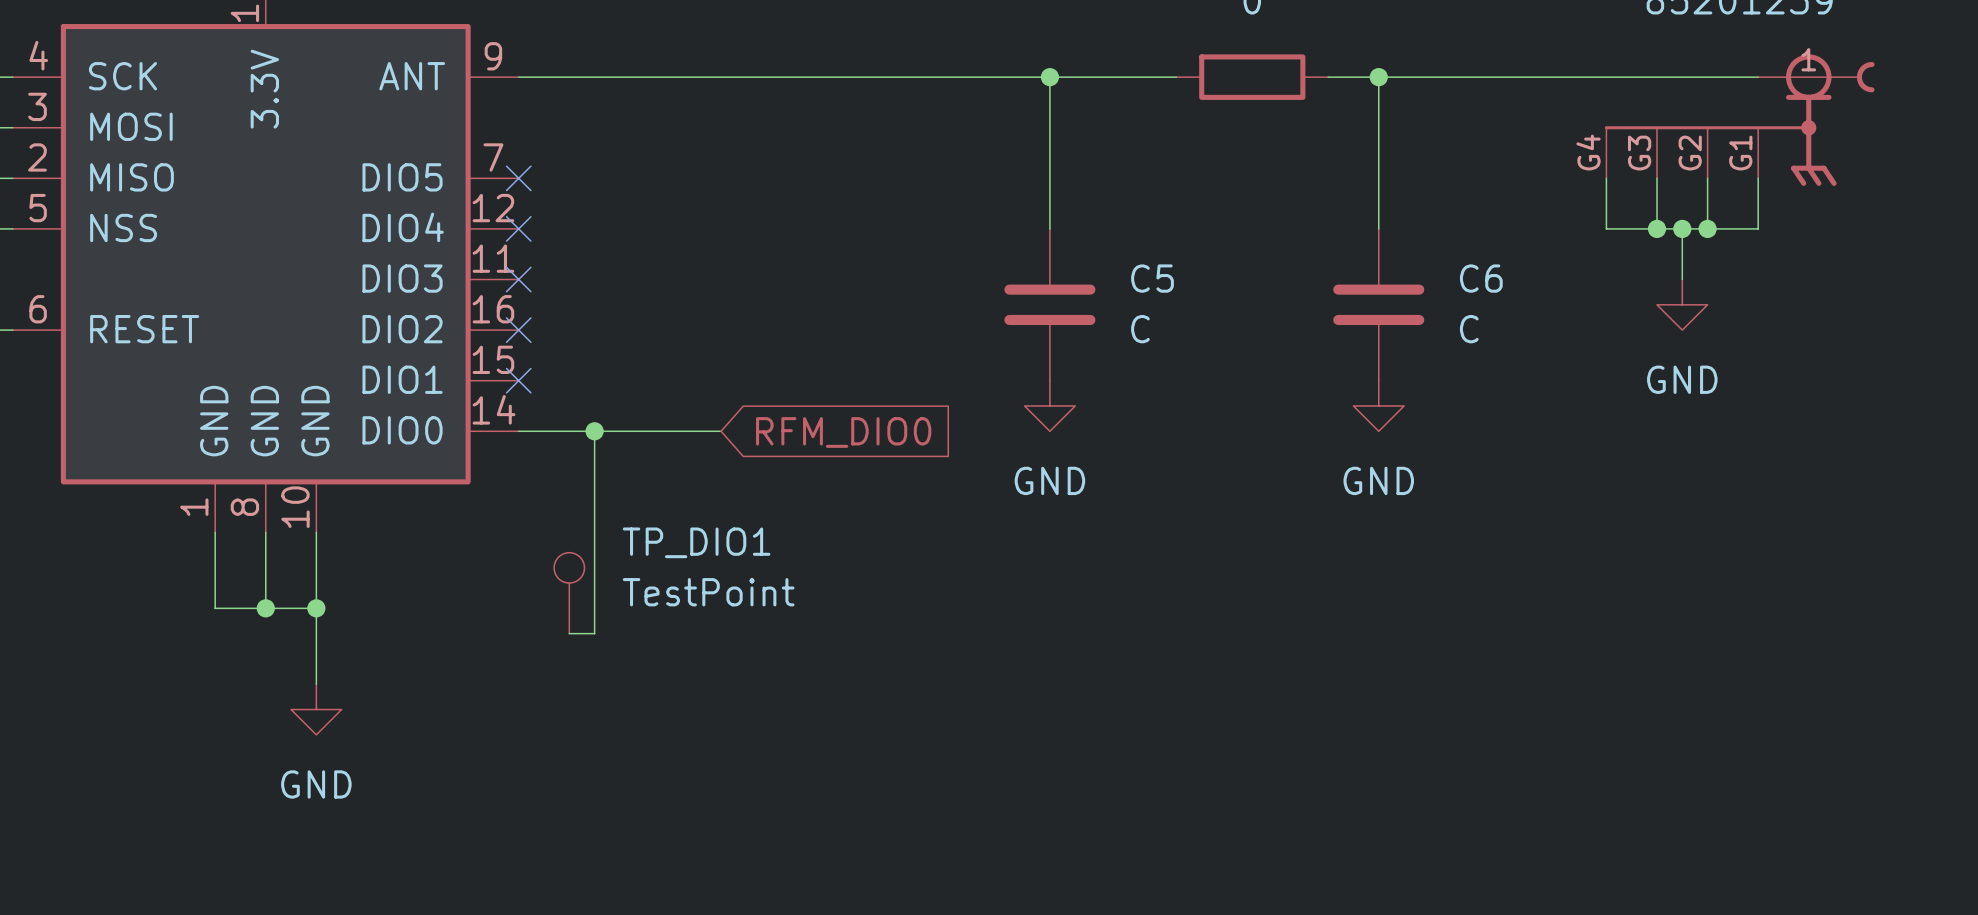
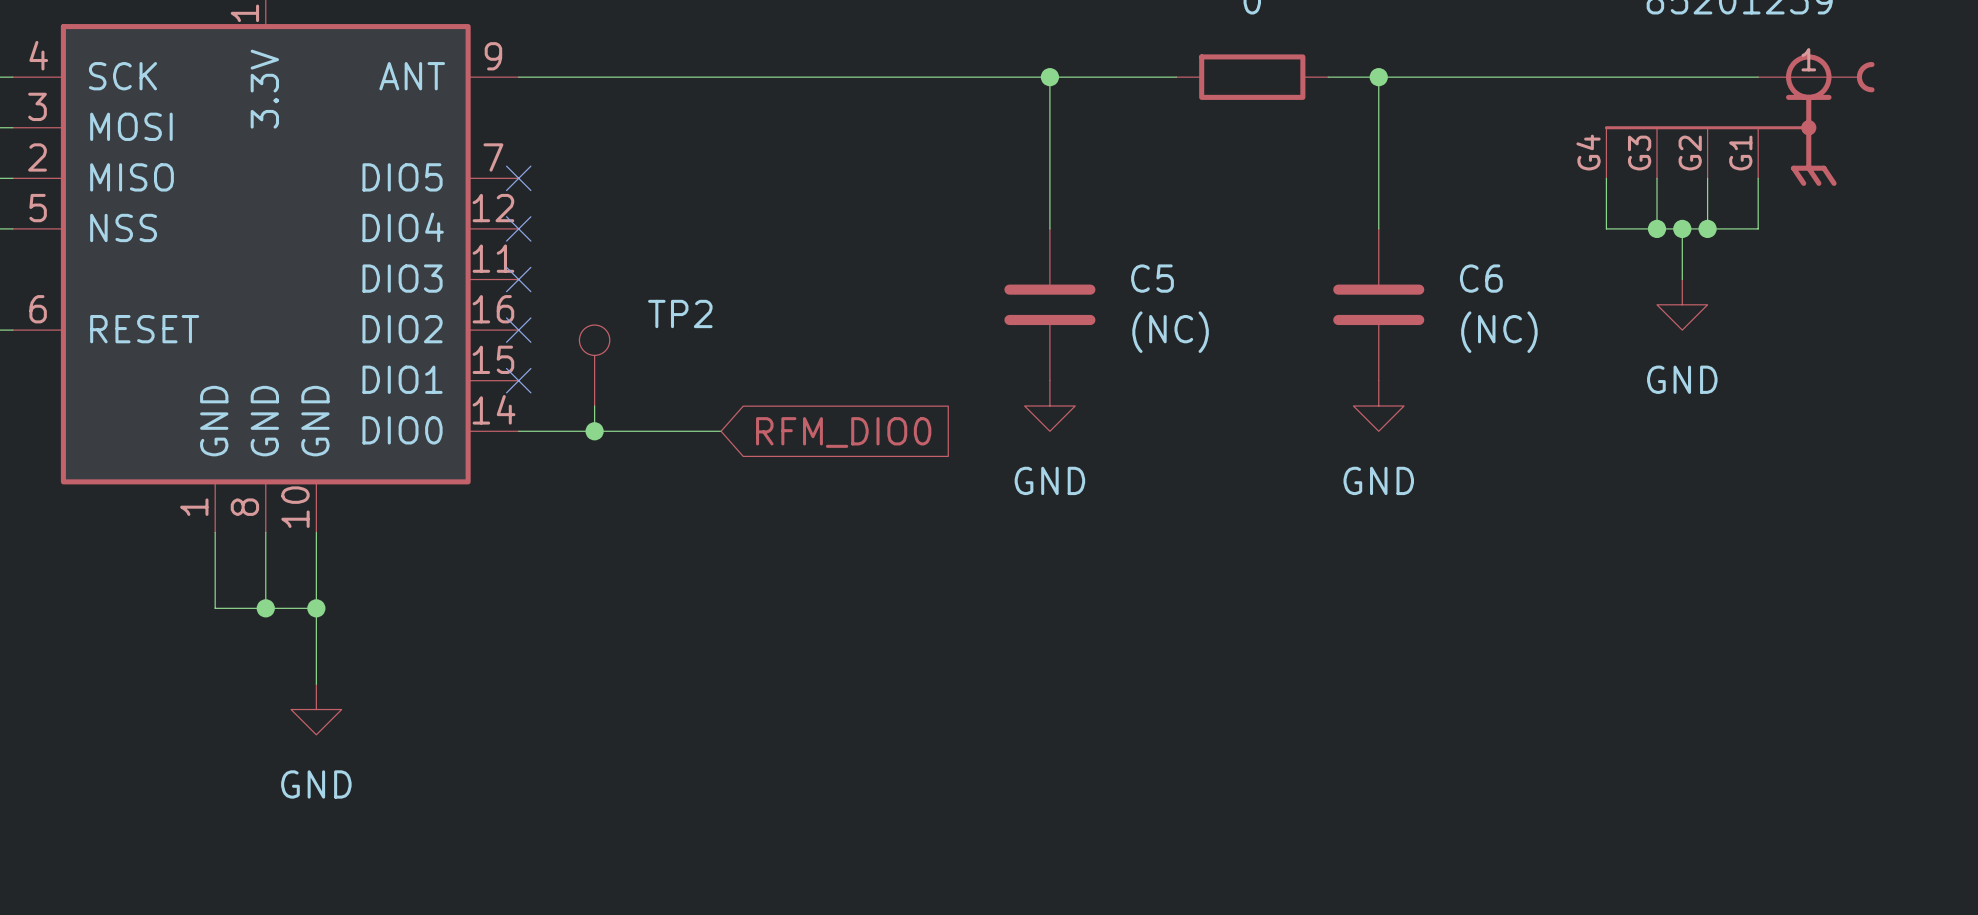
C5 value: C (1140, 329) -> (NC) (1170, 332)
C6 value: C (1469, 329) -> (NC) (1499, 332)
TP2: none -> (594, 365)
wire: (594, 431) (594, 633) (569, 633) -> (594, 431) (594, 405)
TP_DIO1: TestPoint (569, 593) -> none

